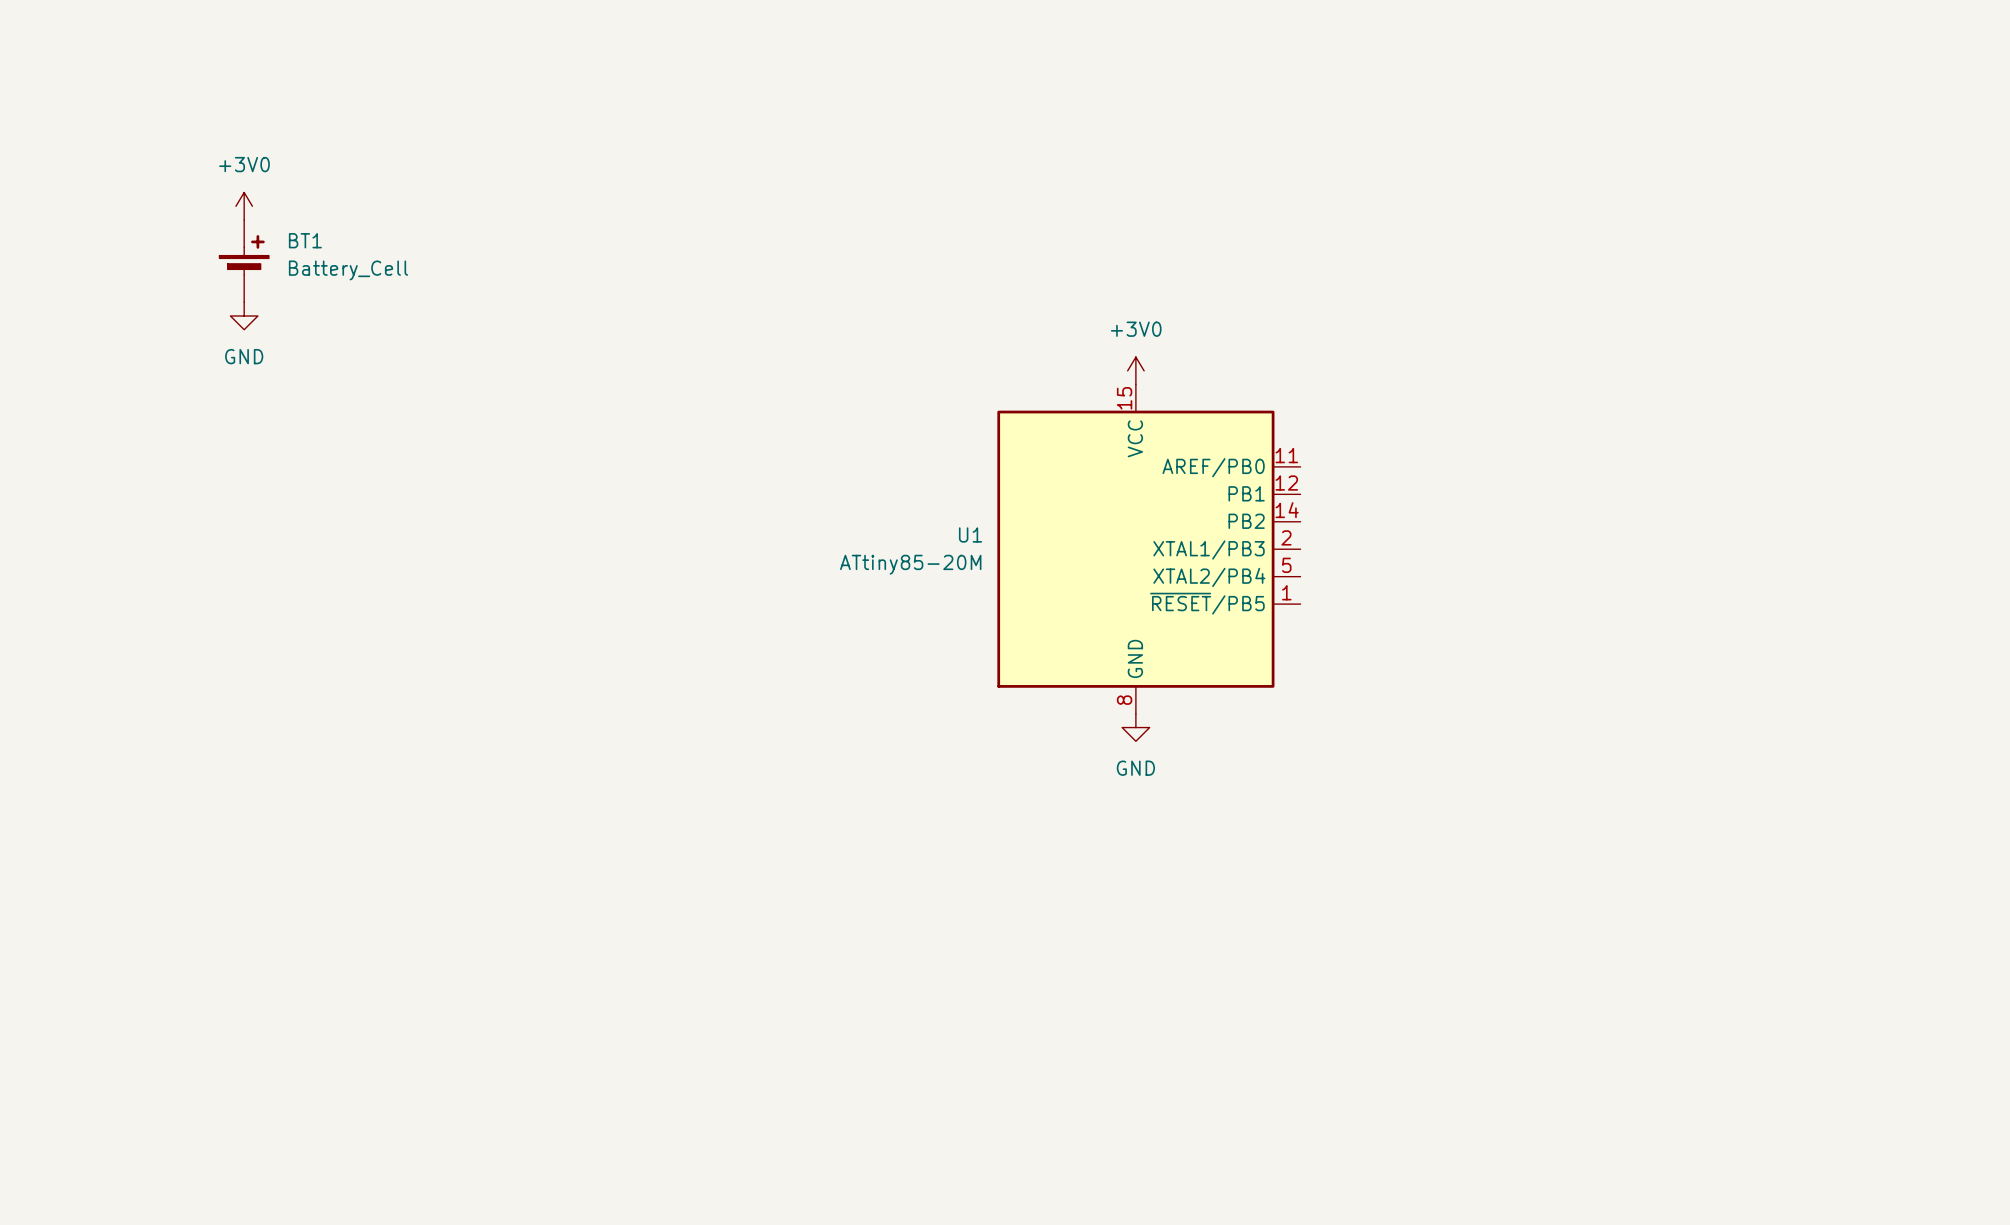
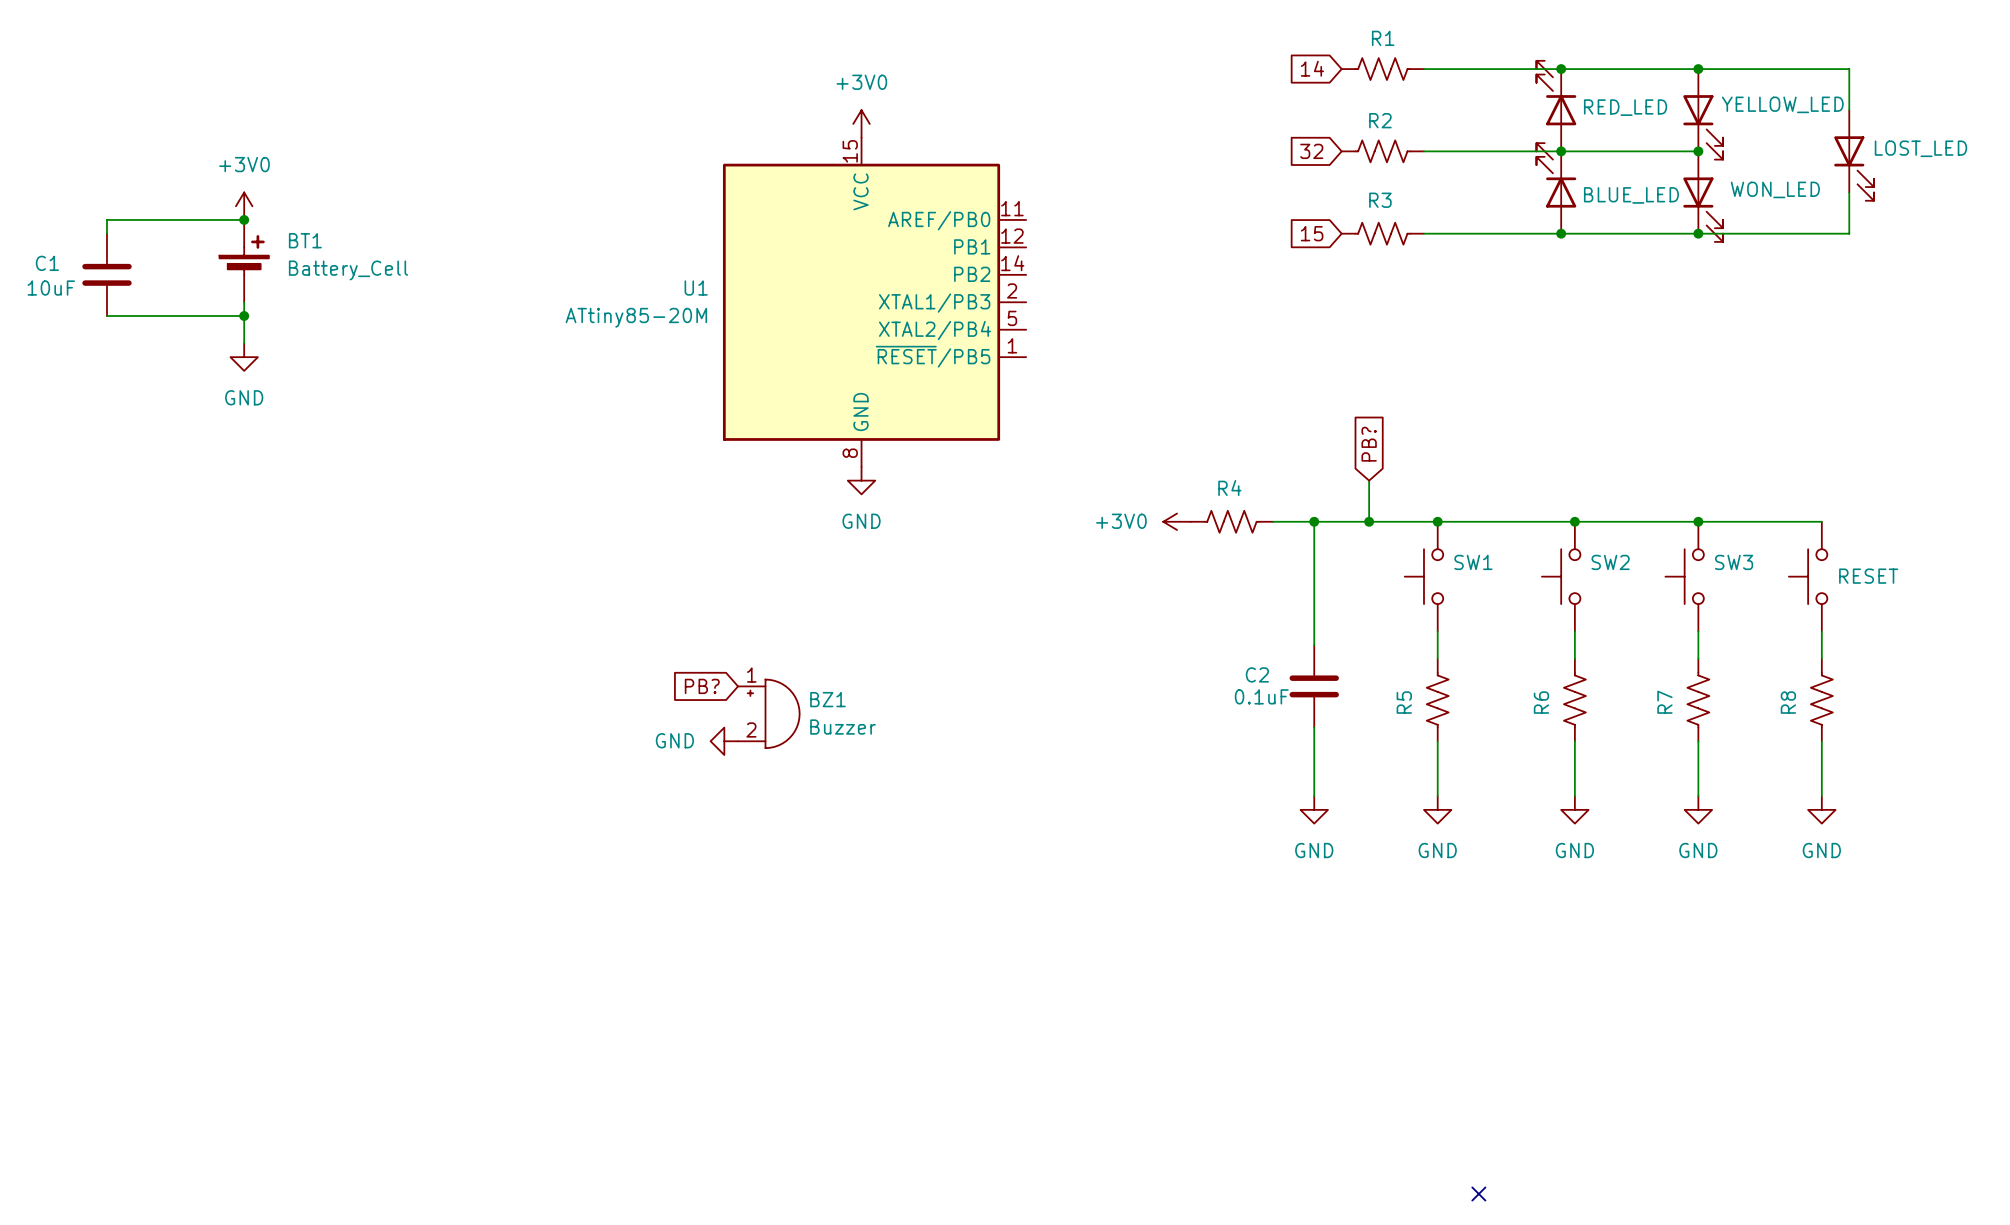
global label: none -> 14 (1312, 68)
R1: none -> (1382, 69)
wire: none -> (1423, 69) (1849, 69) (1849, 110)
junction: none -> (1561, 69)
junction: none -> (1698, 69)
RED_LED: none -> (1556, 106)
YELLOW_LED: none -> (1703, 114)
power symbol: none -> +3V0 (861, 123)
global label: none -> 32 (1311, 151)
R2: none -> (1382, 151)
wire: none -> (1423, 151) (1698, 151)
junction: none -> (1561, 151)
junction: none -> (1698, 151)
LOST_LED: none -> (1854, 155)
BLUE_LED: none -> (1556, 188)
wire: none -> (1849, 192) (1849, 233) (1423, 233)
WON_LED: none -> (1703, 196)
wire: none -> (244, 219) (106, 219) (106, 233)
junction: none -> (244, 219)
global label: none -> 15 (1312, 233)
R3: none -> (1382, 233)
junction: none -> (1561, 233)
junction: none -> (1698, 233)
C1: none -> 10uF (106, 274)
wire: none -> (244, 302) (244, 343)
wire: none -> (106, 316) (244, 316)
power symbol position: GND (244, 316) -> GND (244, 357)
junction: none -> (244, 316)
power symbol rotation: 0° (1135, 370) -> 90° counterclockwise (1177, 521)
power symbol position: +3V0 (1135, 370) -> +3V0 (1177, 521)
global label: none -> PB? (1369, 444)
power symbol: none -> GND (861, 480)
wire: none -> (1369, 480) (1369, 521)
R4: none -> (1231, 521)
wire: none -> (1273, 521) (1821, 521)
wire: none -> (1314, 521) (1314, 645)
junction: none -> (1314, 521)
junction: none -> (1369, 521)
junction: none -> (1437, 521)
junction: none -> (1574, 521)
junction: none -> (1698, 521)
U1 position: (1148, 549) -> (874, 302)
SW1: none -> (1423, 576)
SW2: none -> (1561, 576)
SW3: none -> (1684, 576)
RESET: none -> (1808, 576)
wire: none -> (1437, 631) (1437, 658)
wire: none -> (1574, 631) (1574, 658)
wire: none -> (1698, 631) (1698, 658)
wire: none -> (1821, 631) (1821, 658)
global label: none -> PB? (702, 686)
C2: none -> 0.1uF (1314, 686)
R5: none -> (1437, 700)
R6: none -> (1574, 700)
R7: none -> (1698, 700)
R8: none -> (1821, 700)
BZ1: none -> Buzzer (768, 713)
power symbol: GND (1135, 727) -> none
wire: none -> (1314, 727) (1314, 796)
power symbol: none -> GND (724, 741)
wire: none -> (1437, 741) (1437, 796)
wire: none -> (1574, 741) (1574, 796)
wire: none -> (1698, 741) (1698, 796)
wire: none -> (1821, 741) (1821, 796)
power symbol: none -> GND (1314, 809)
power symbol: none -> GND (1437, 809)
power symbol: none -> GND (1574, 809)
power symbol: none -> GND (1698, 809)
power symbol: none -> GND (1821, 809)
no-connect mark: none -> (1478, 1194)

